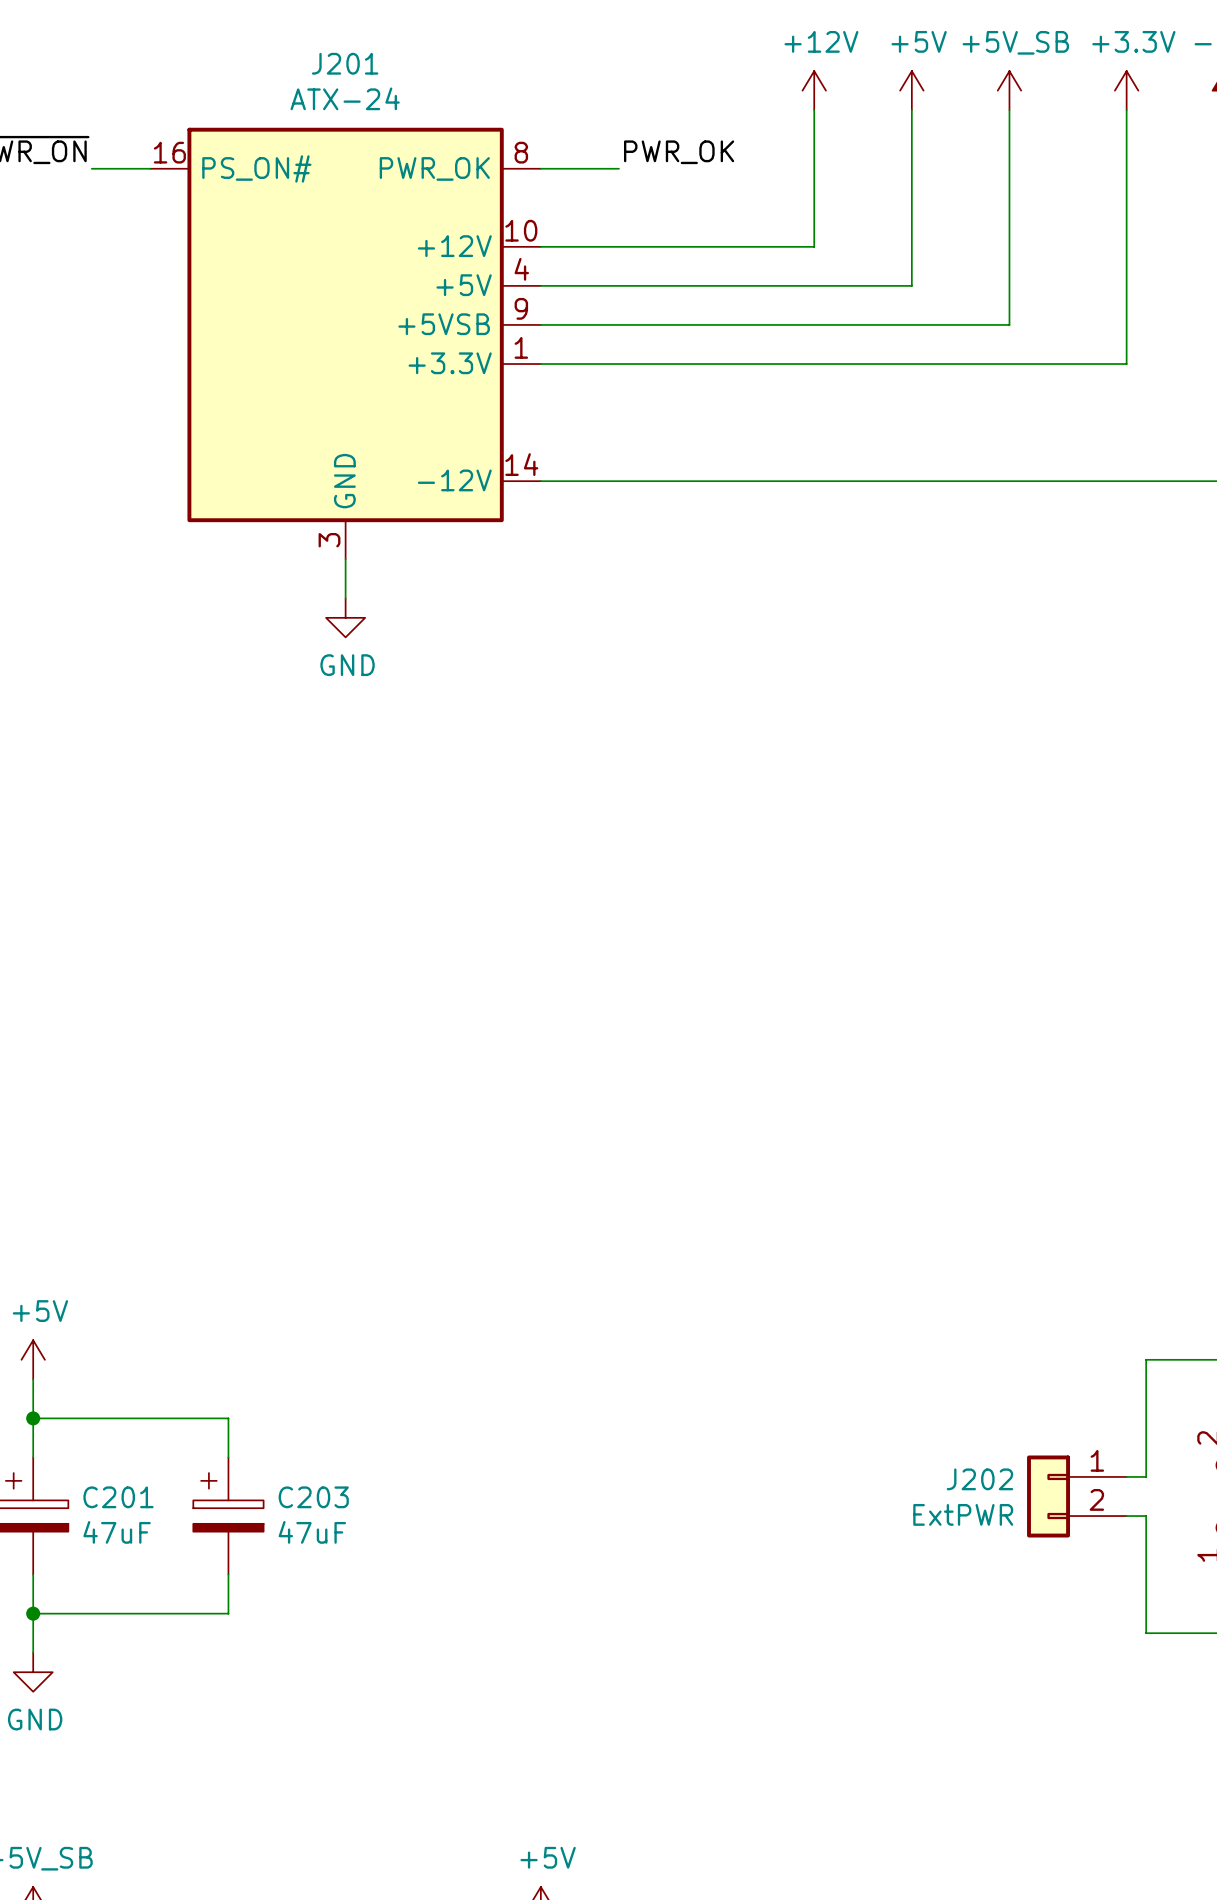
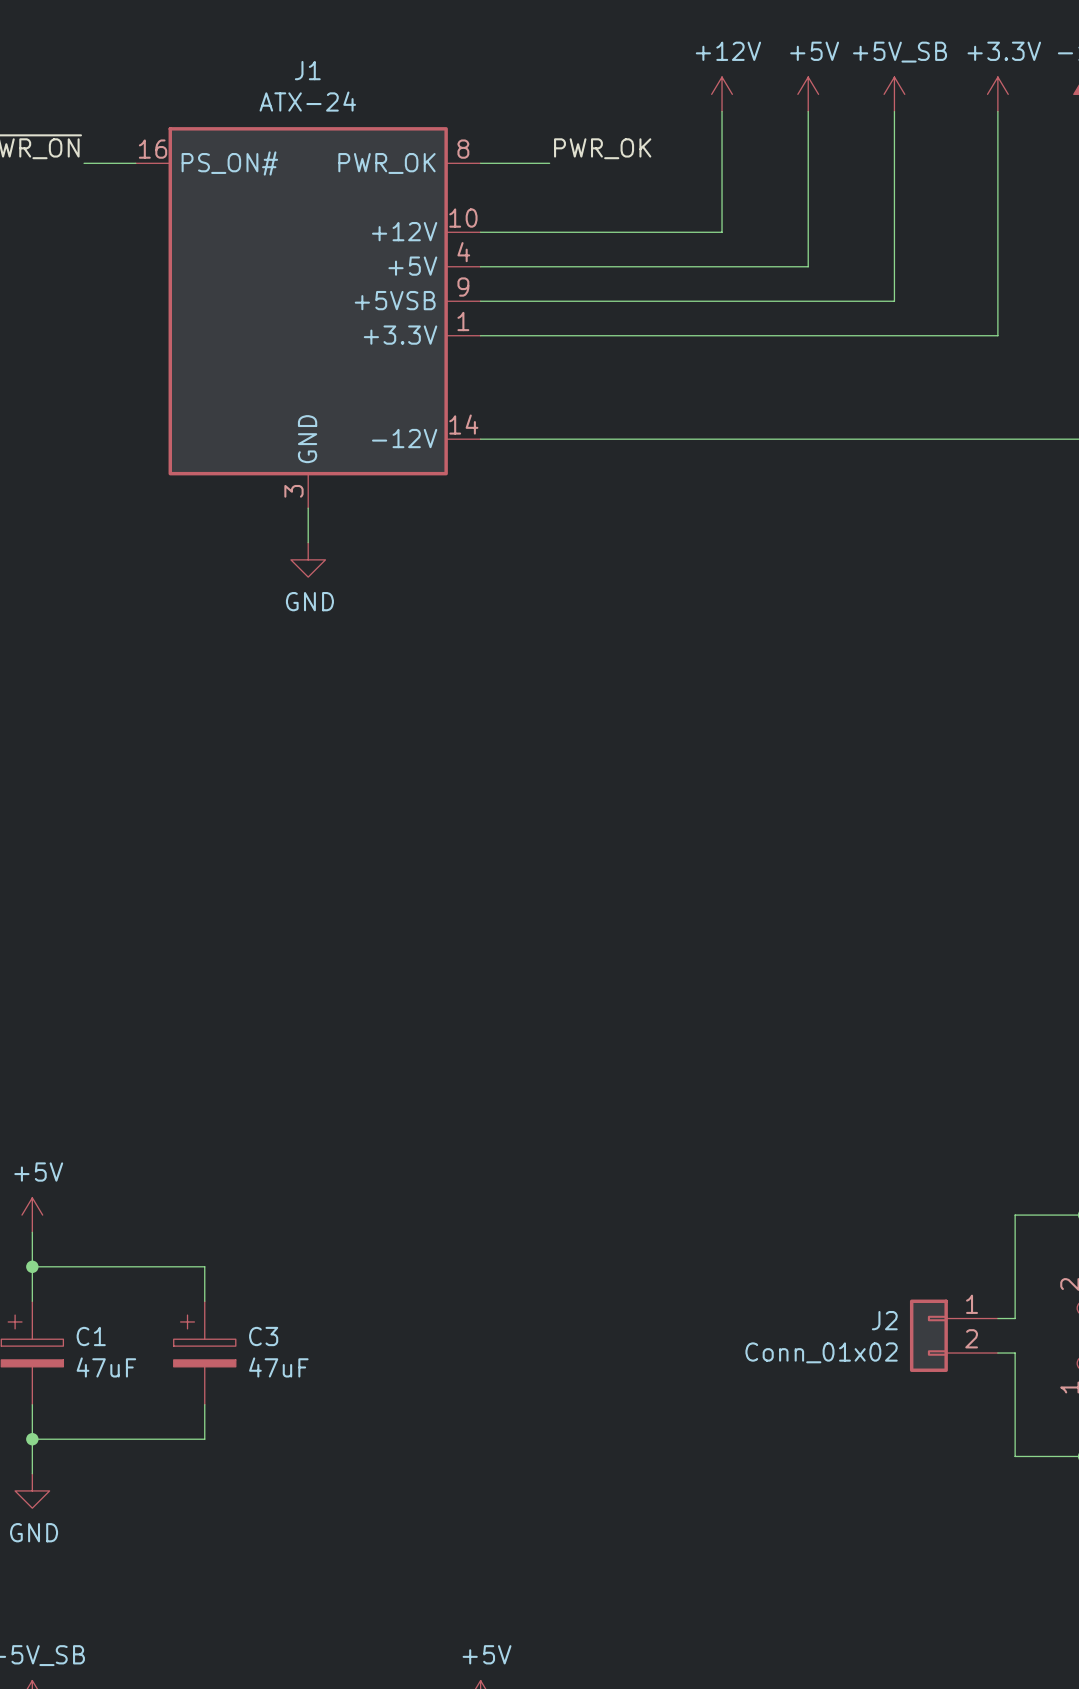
J201 name: J201 (345, 63) -> J1 (307, 70)
J202 name: J202 (979, 1479) -> J2 (884, 1320)
C201 name: C201 (118, 1497) -> C1 (91, 1336)
C203 name: C203 (313, 1497) -> C3 (263, 1336)
J202 value: ExtPWR (963, 1514) -> Conn_01x02 (821, 1352)

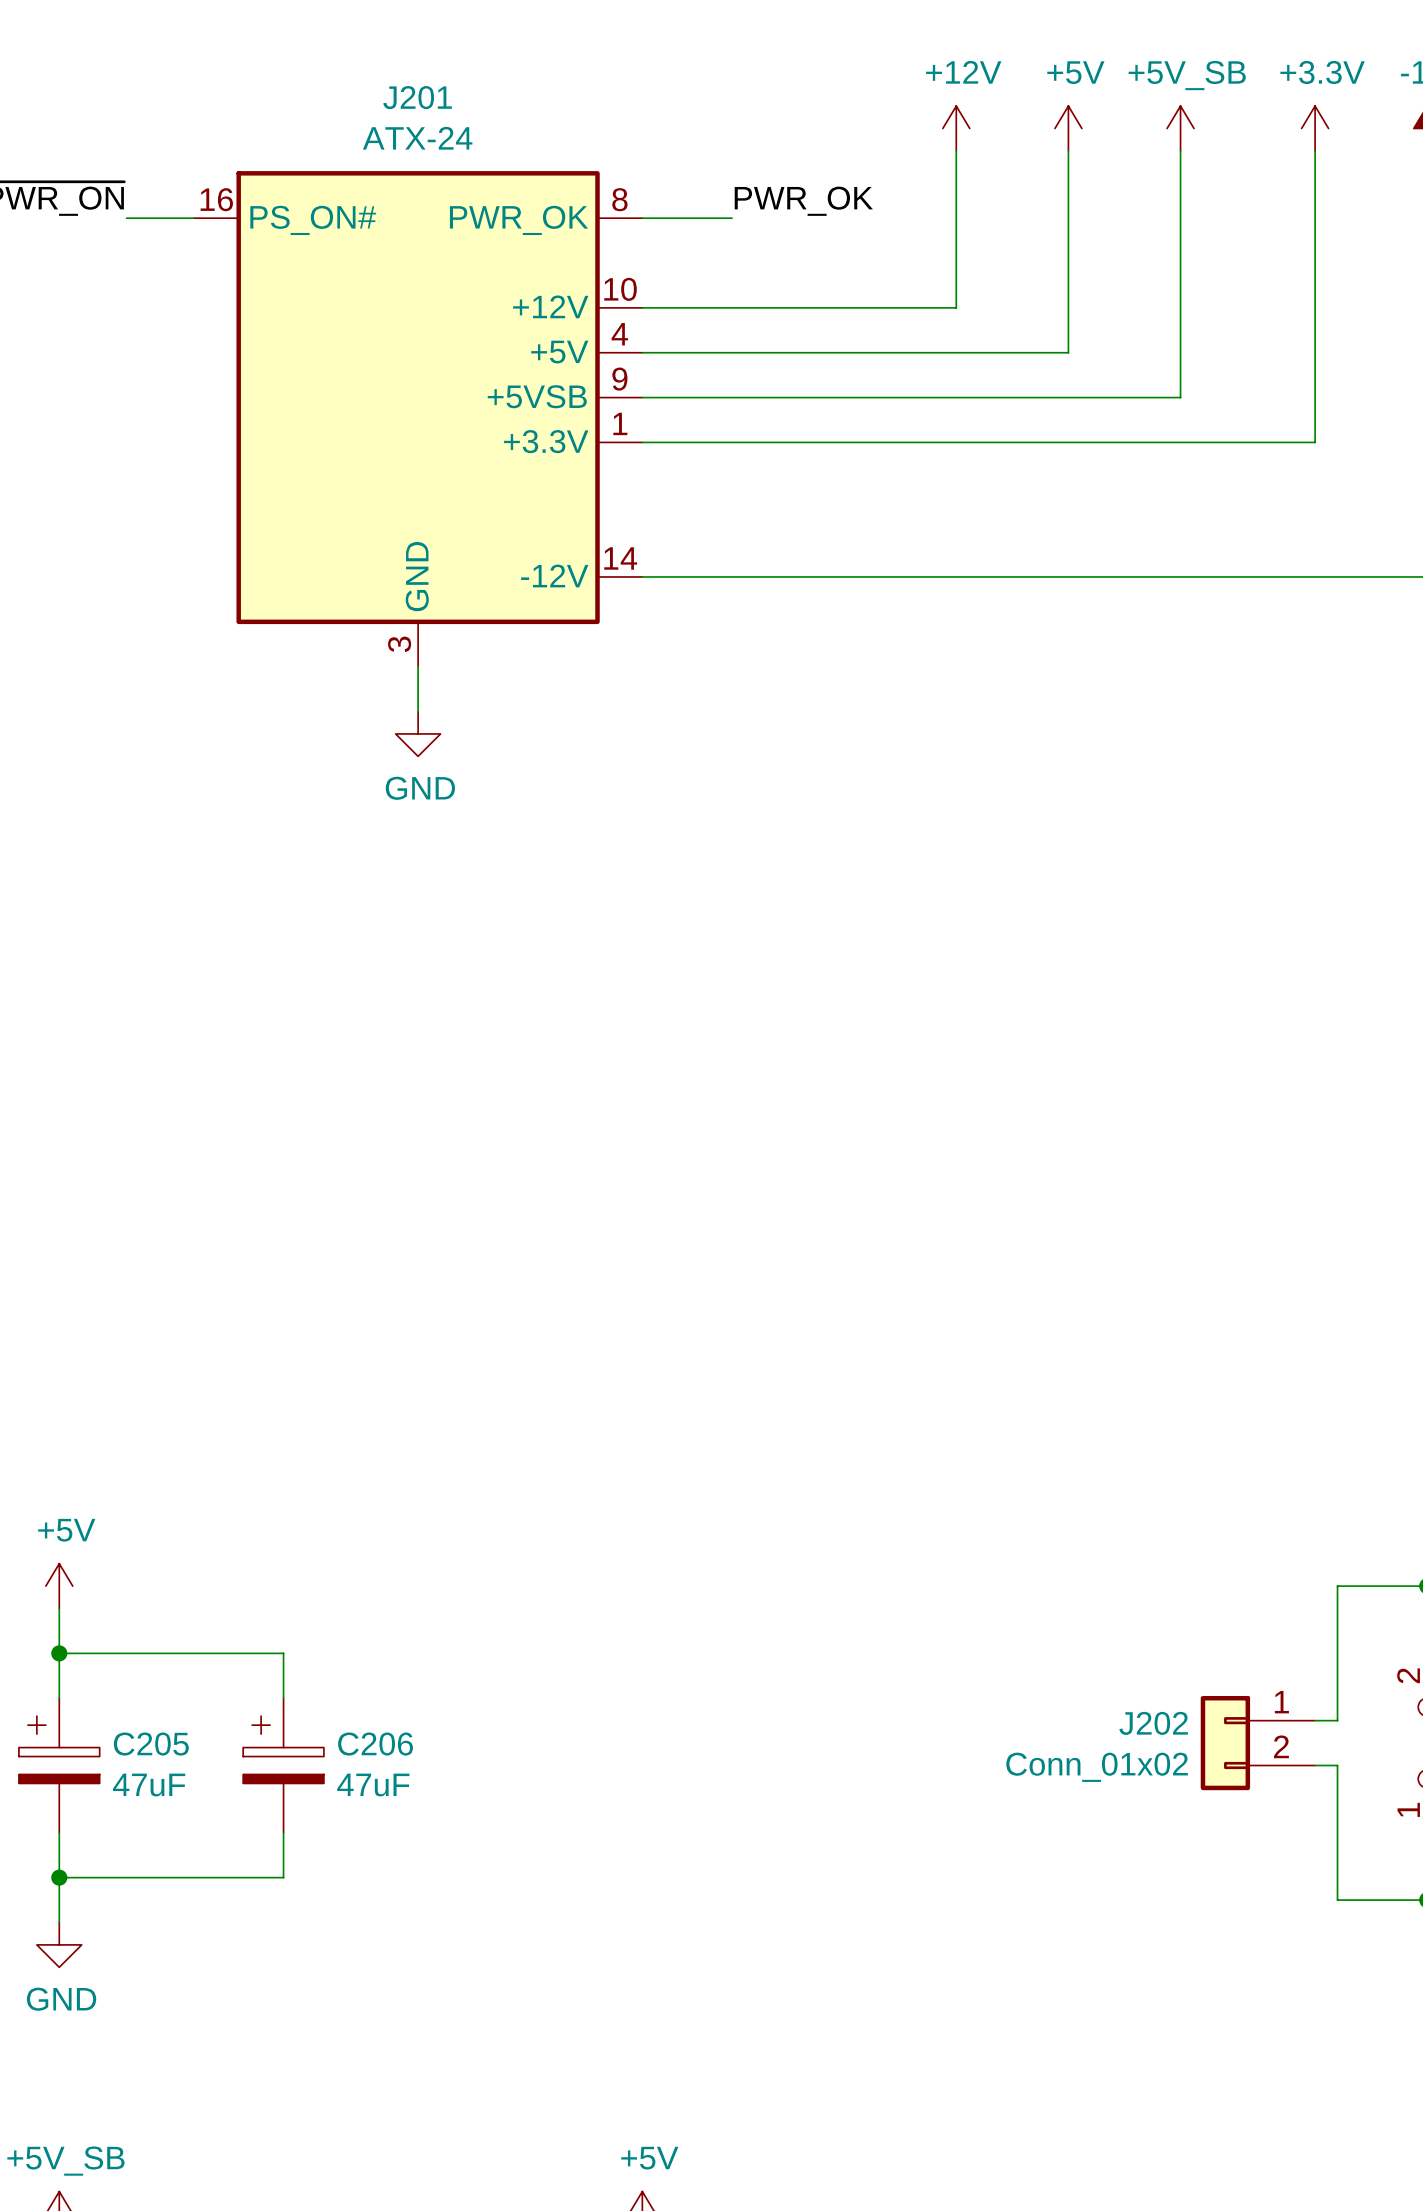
J1 name: J1 (307, 70) -> J201 (417, 97)
J2 name: J2 (884, 1320) -> J202 (1153, 1723)
C1 name: C1 (91, 1336) -> C205 (151, 1744)
C3 name: C3 (263, 1336) -> C206 (375, 1744)

